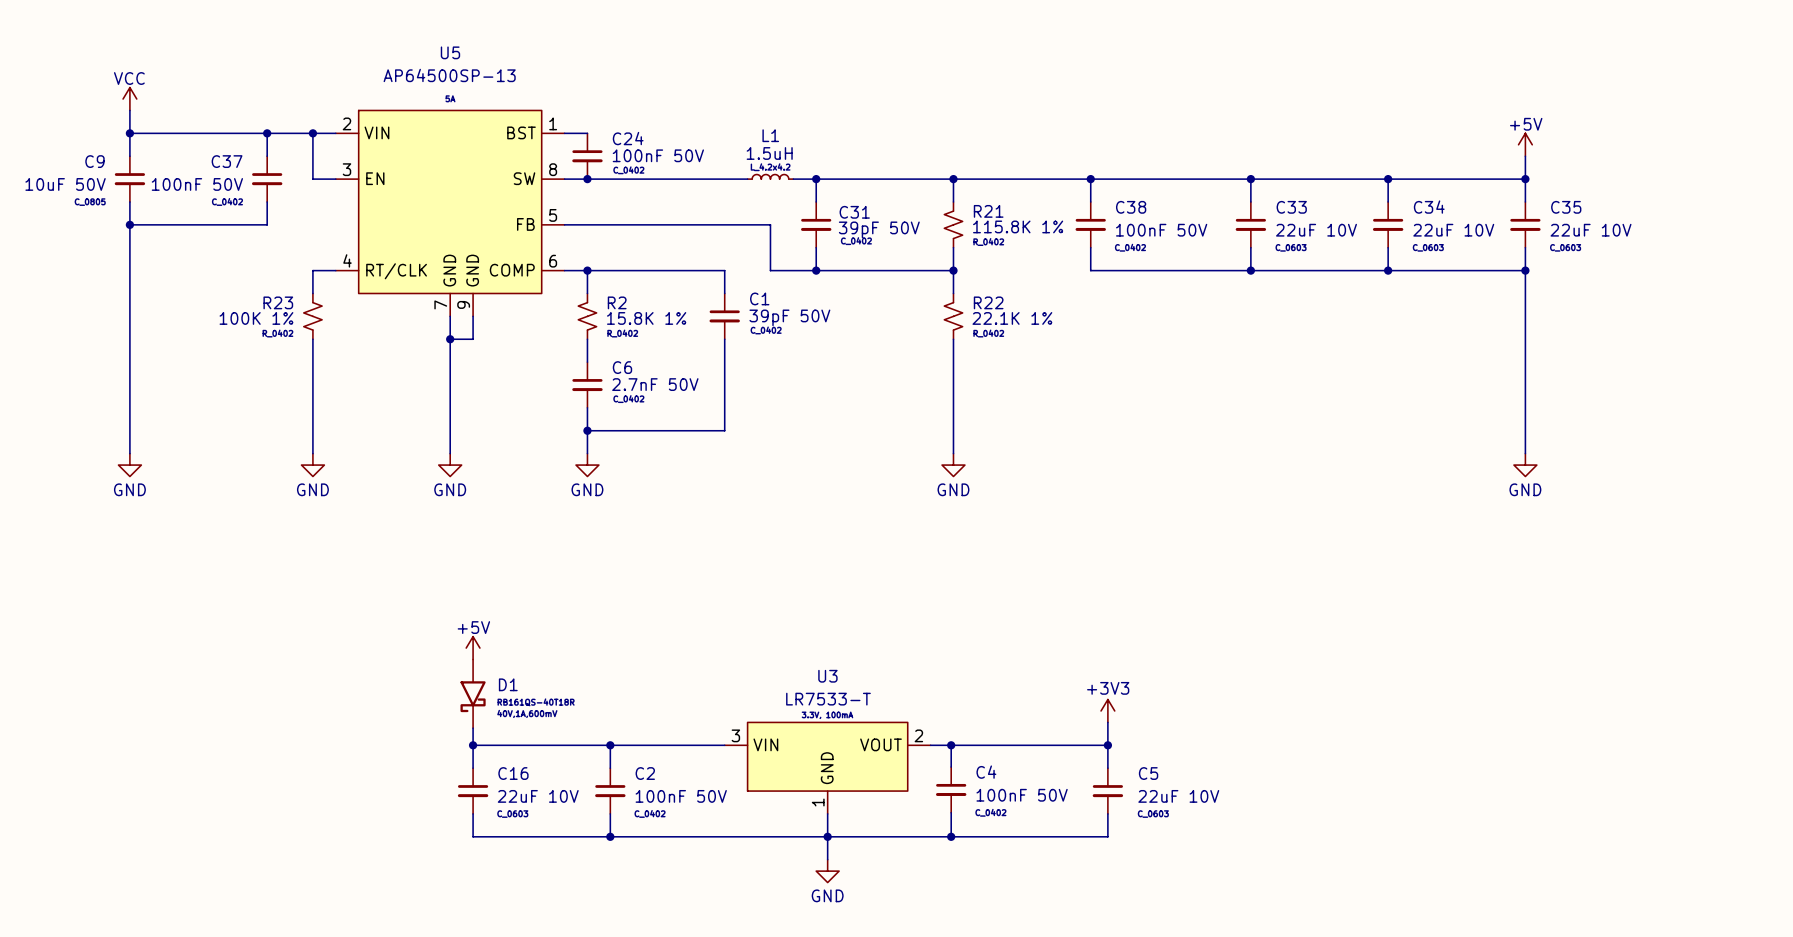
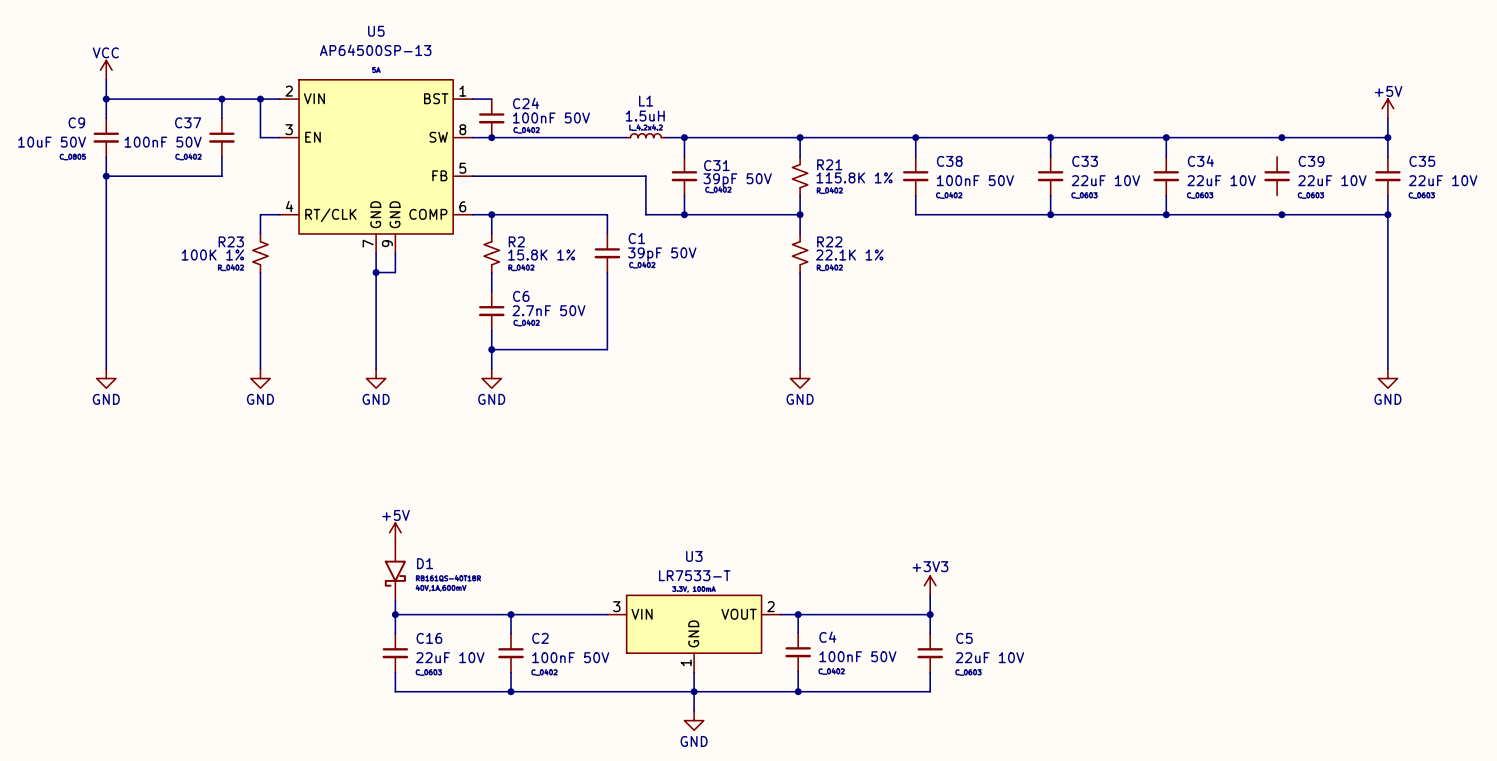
power symbol position: +5V (1525, 144) -> +5V (1387, 108)
wire: (1525, 156) (1525, 201) -> (1387, 118) (1387, 156)
wire: none -> (1281, 137) (1387, 137)
junction: none -> (1387, 137)
C39: none -> 22uF 10V (1277, 176)
C35 position: (1525, 224) -> (1387, 176)
wire: (1525, 247) (1525, 453) -> (1387, 195) (1387, 368)
wire: none -> (1281, 214) (1387, 214)
junction: none -> (1387, 214)
power symbol position: GND (1525, 465) -> GND (1387, 378)

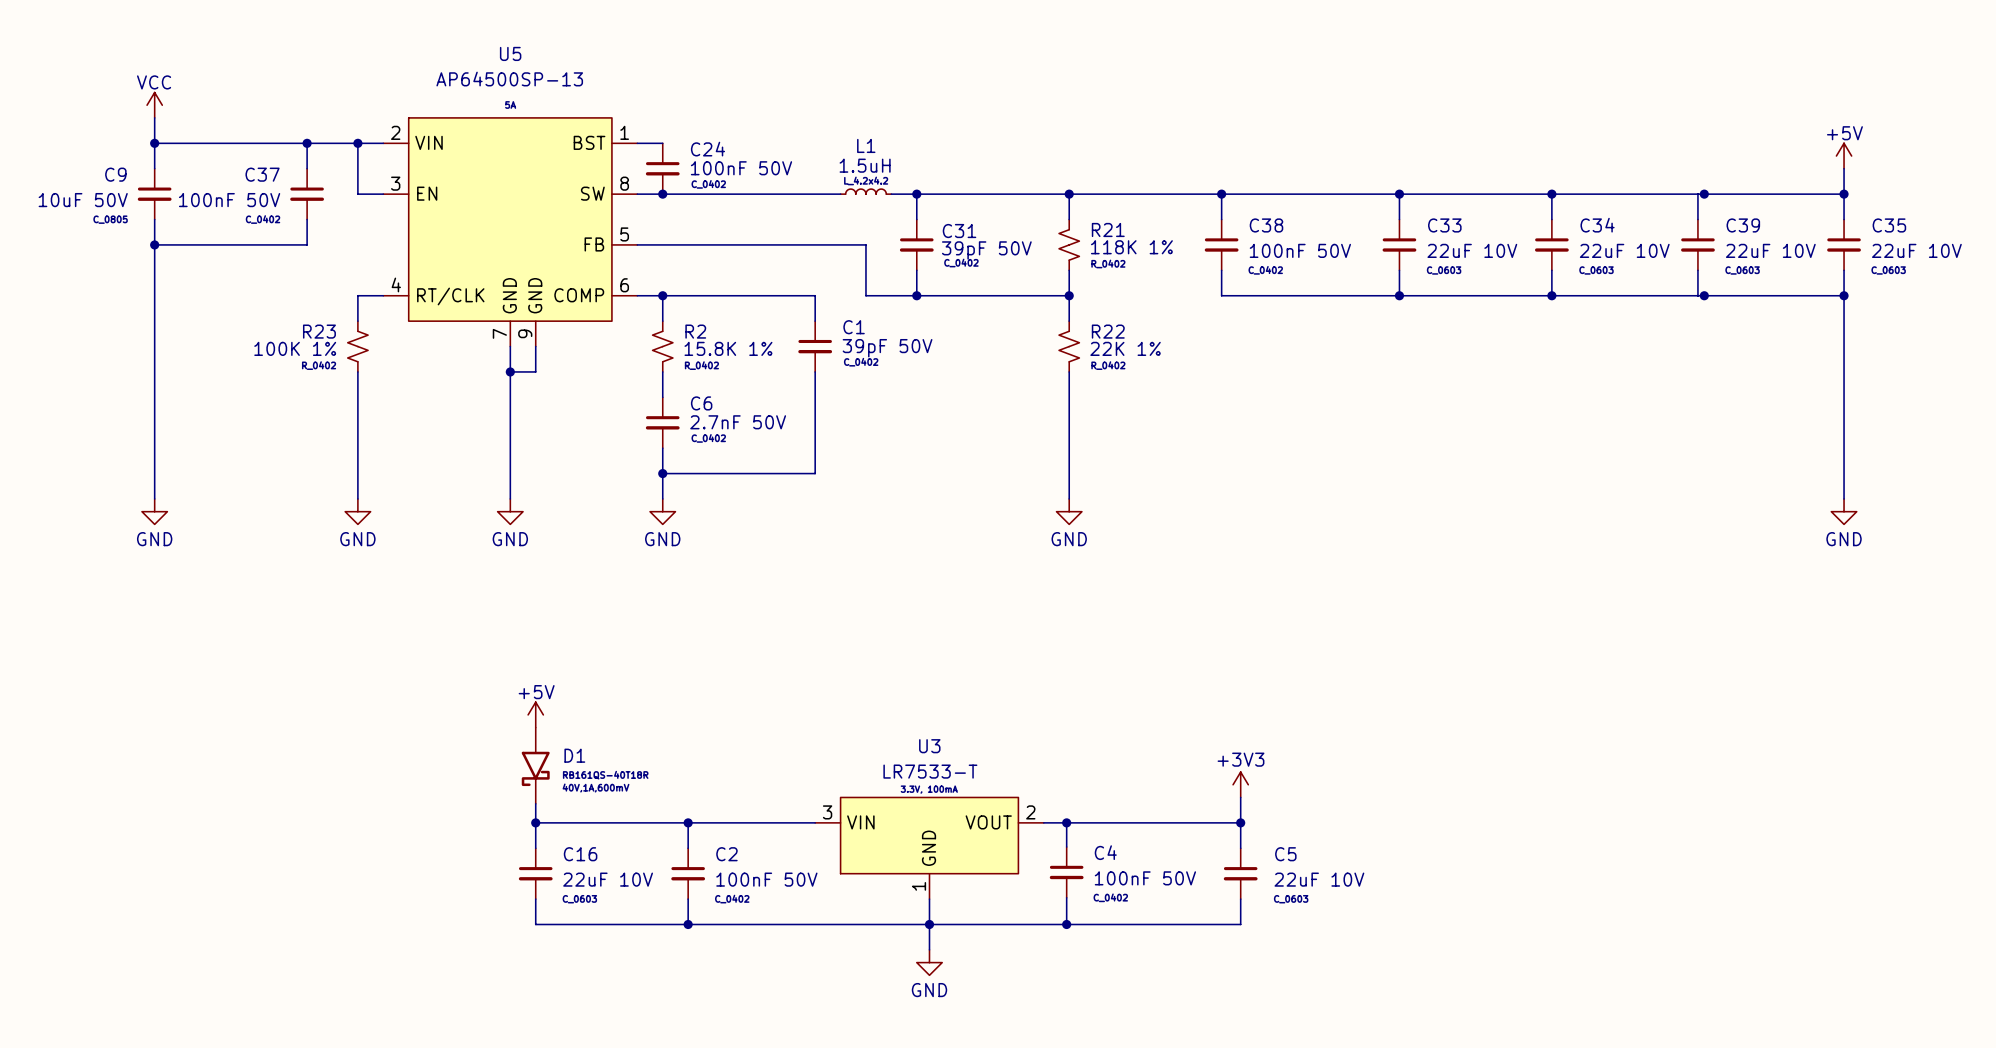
wire: none -> (1697, 194) (1697, 219)
R21 value: 115.8K 1% (854, 177) -> 118K 1% (1131, 247)
wire: none -> (1697, 270) (1697, 295)
R22 value: 22.1K 1% (849, 255) -> 22K 1% (1125, 348)

